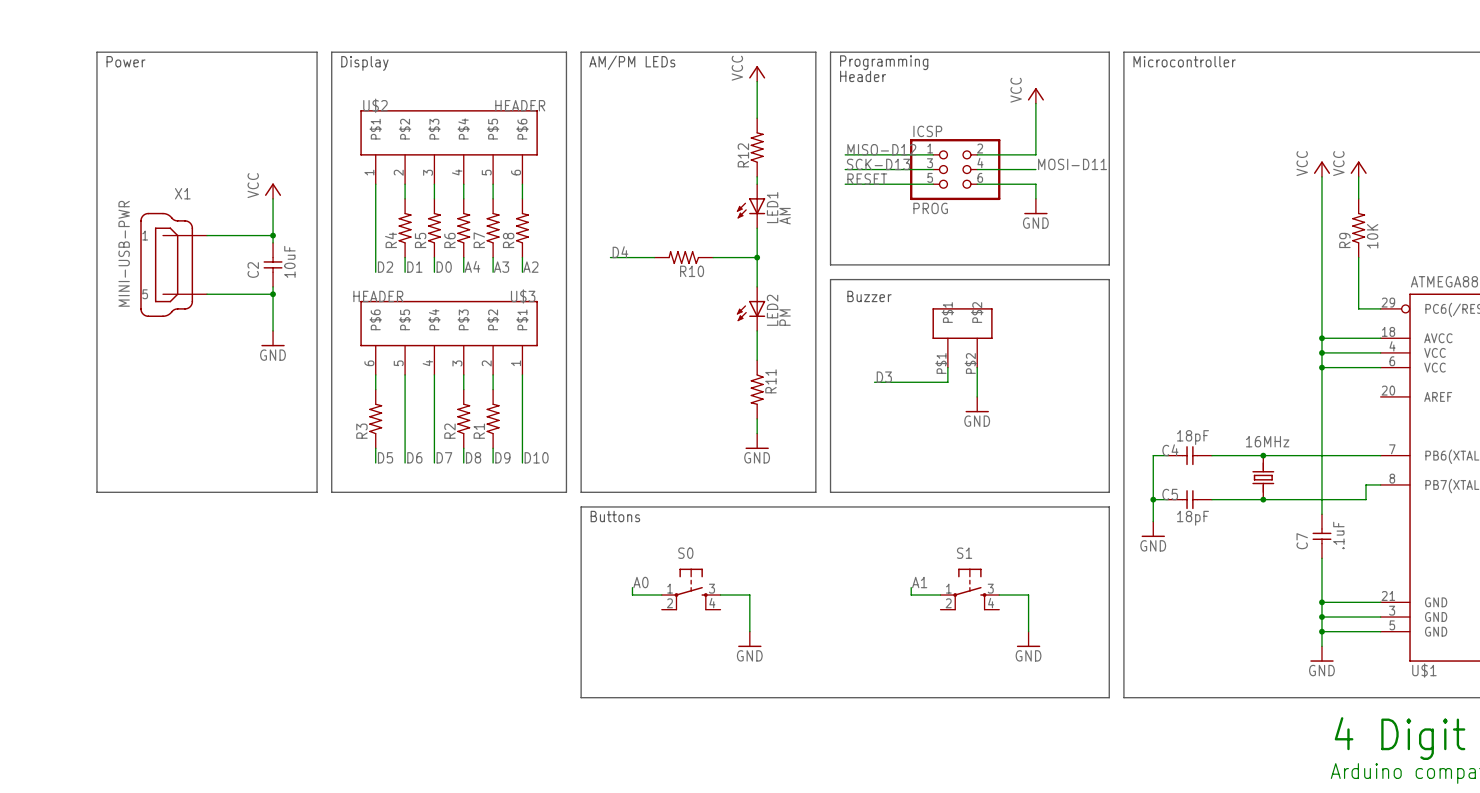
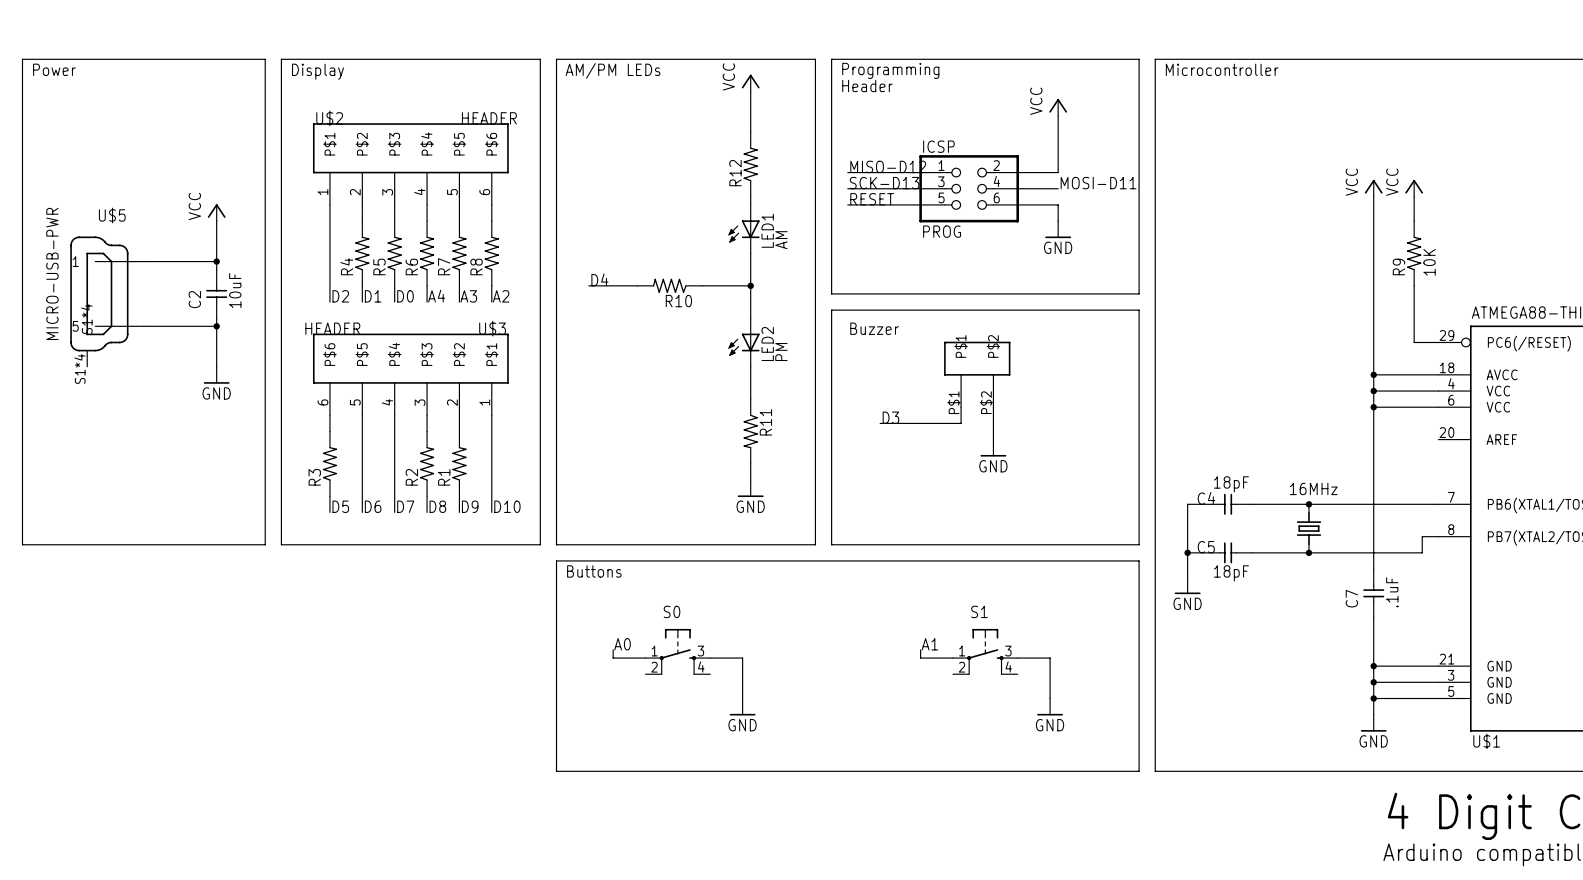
X1: MINI-USB-PWR (173, 264) -> none
U$5: none -> MICRO-USB-PWR (107, 301)

